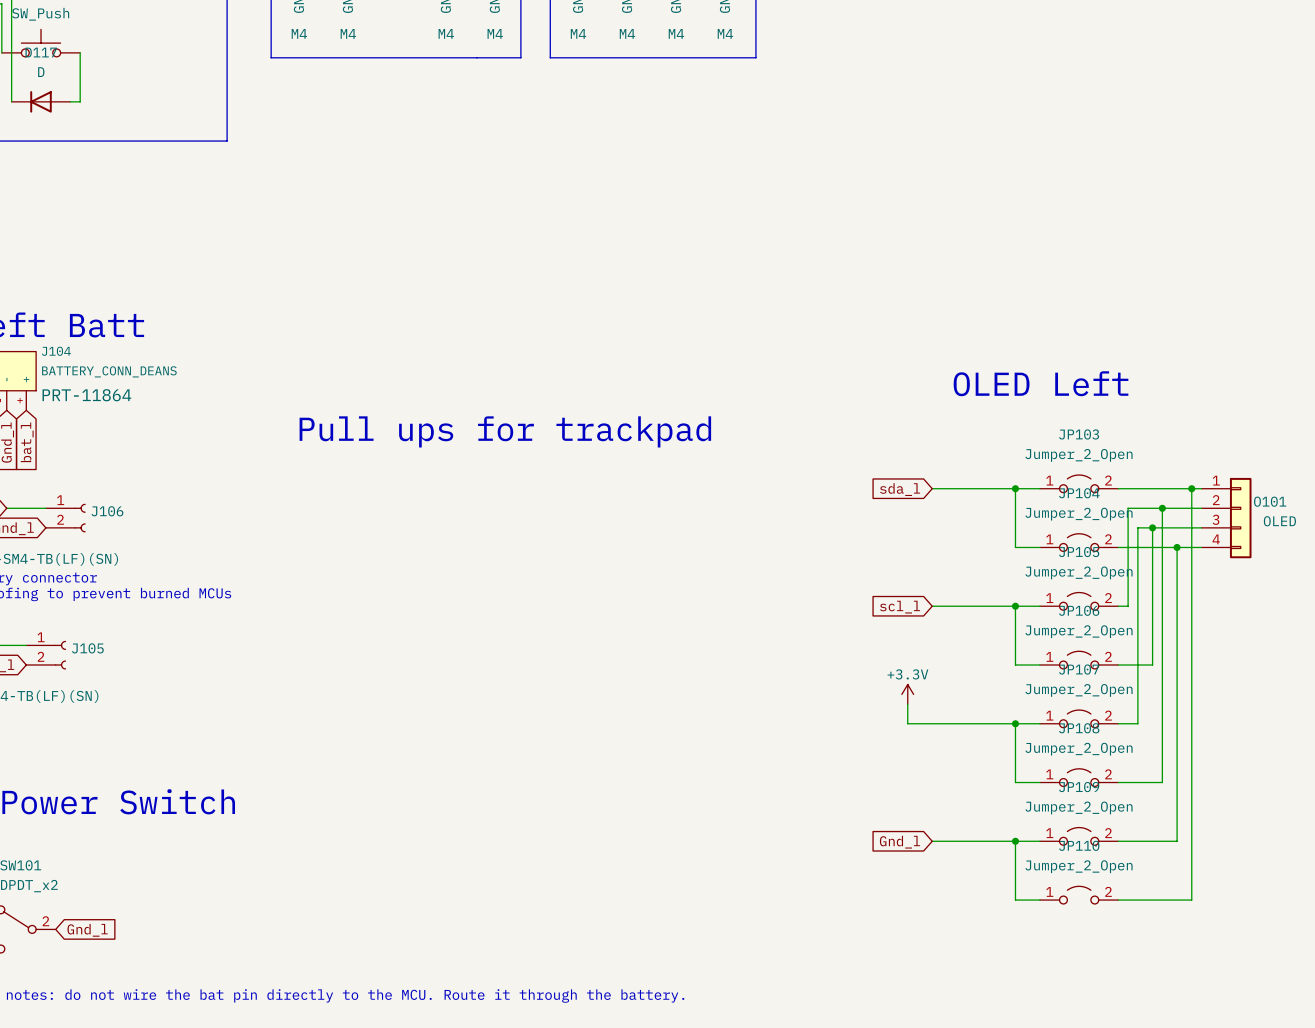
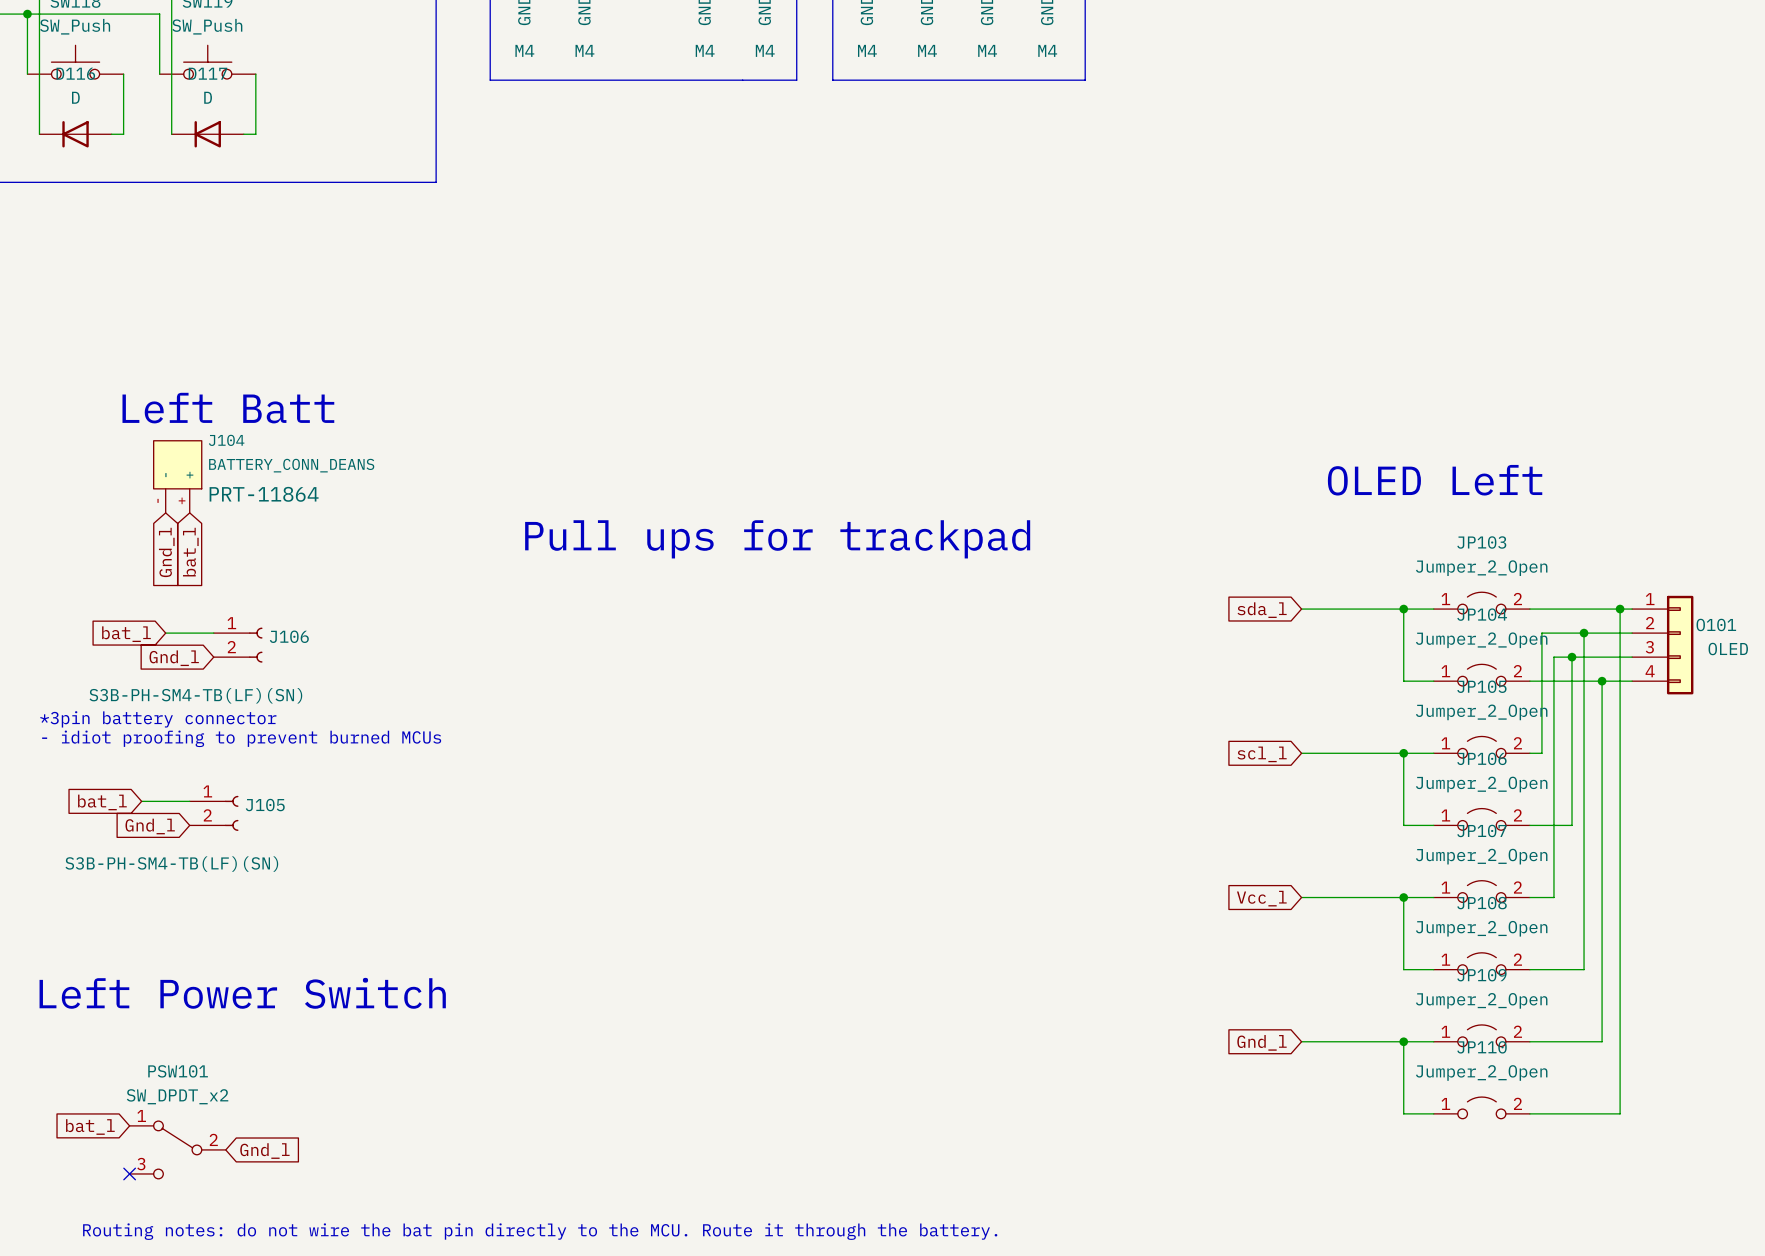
power symbol: +3.3V (907, 694) -> none
wire: (907, 704) (907, 723) (932, 723) -> none
global label: none -> Vcc_l (1261, 898)

